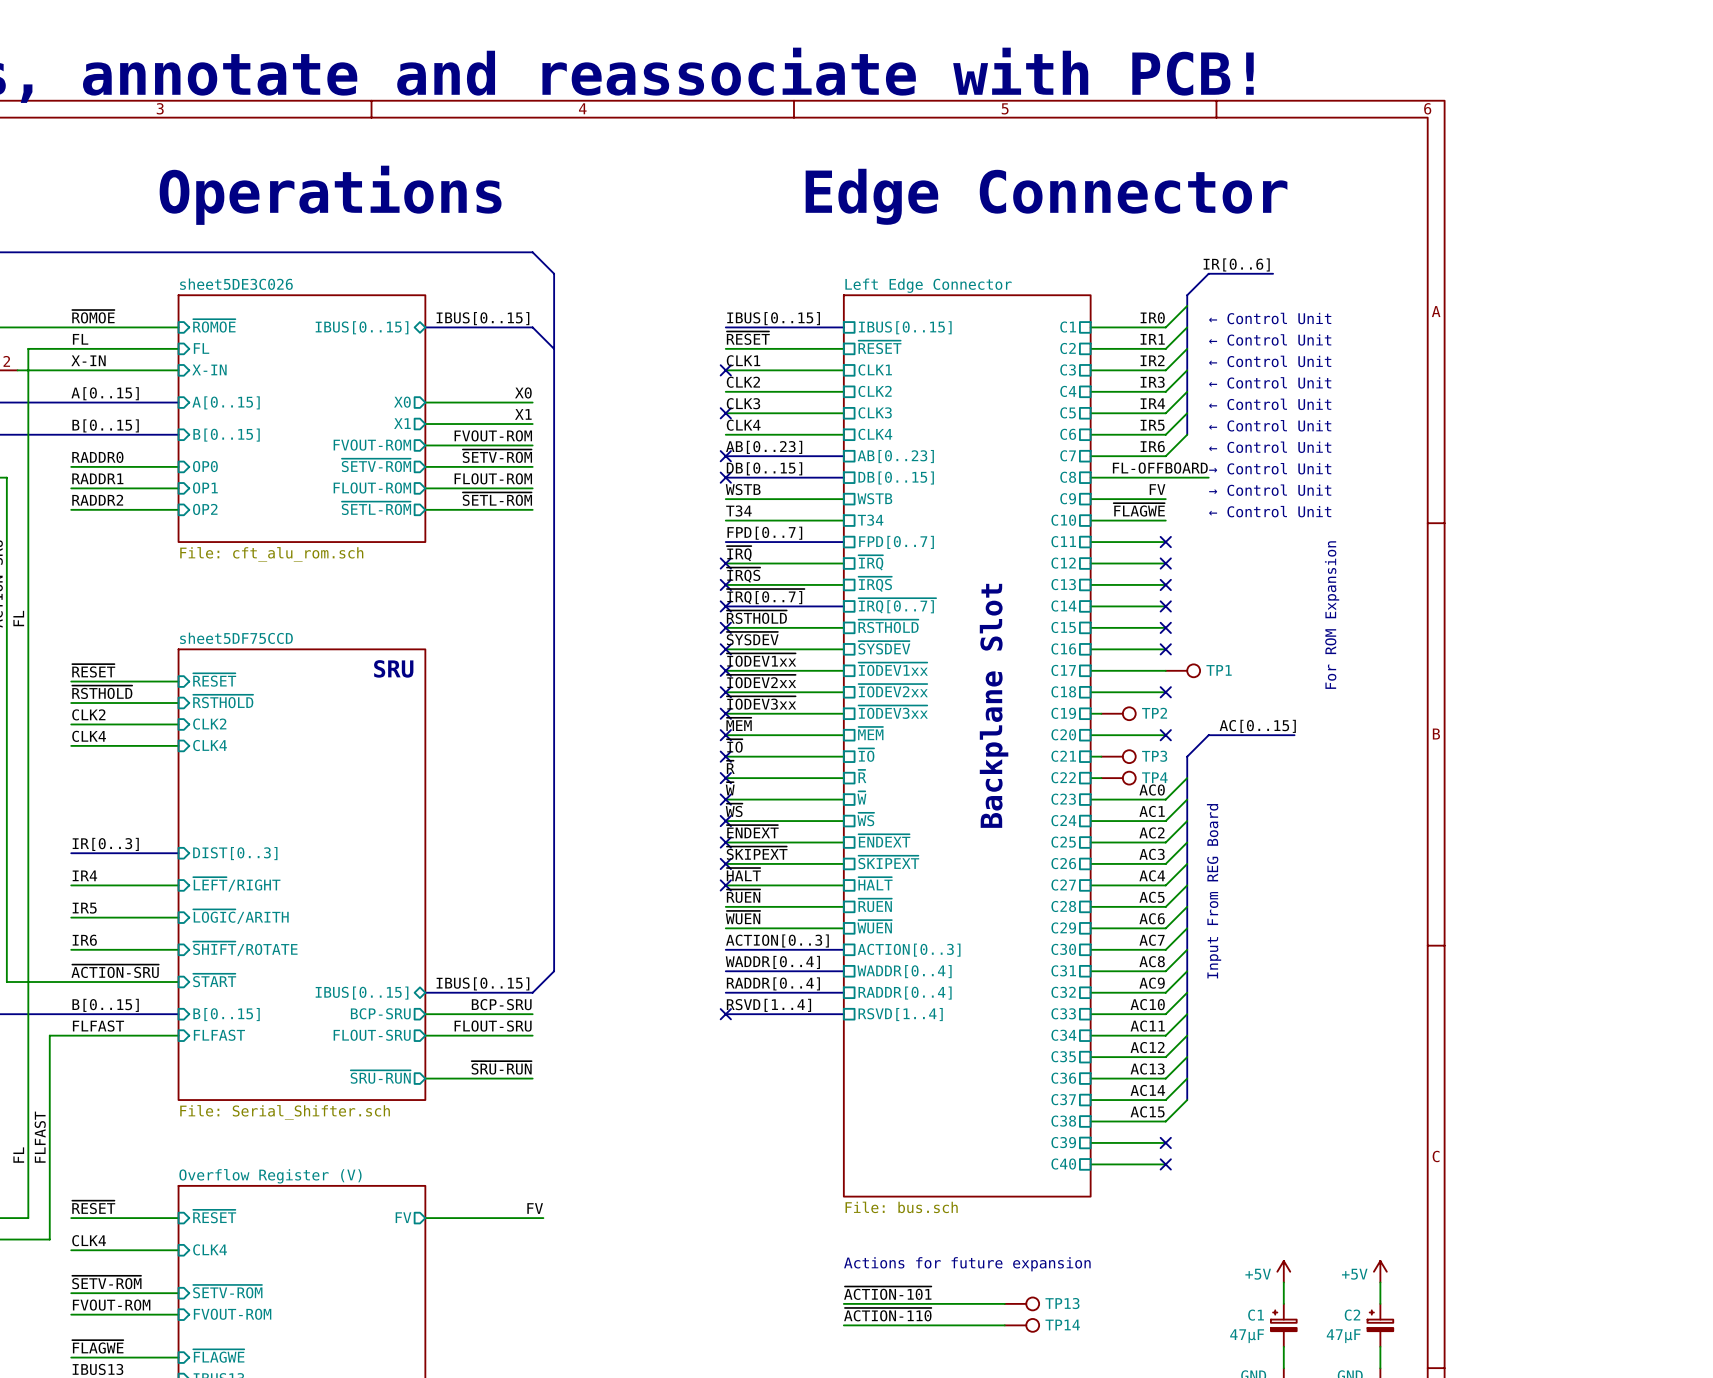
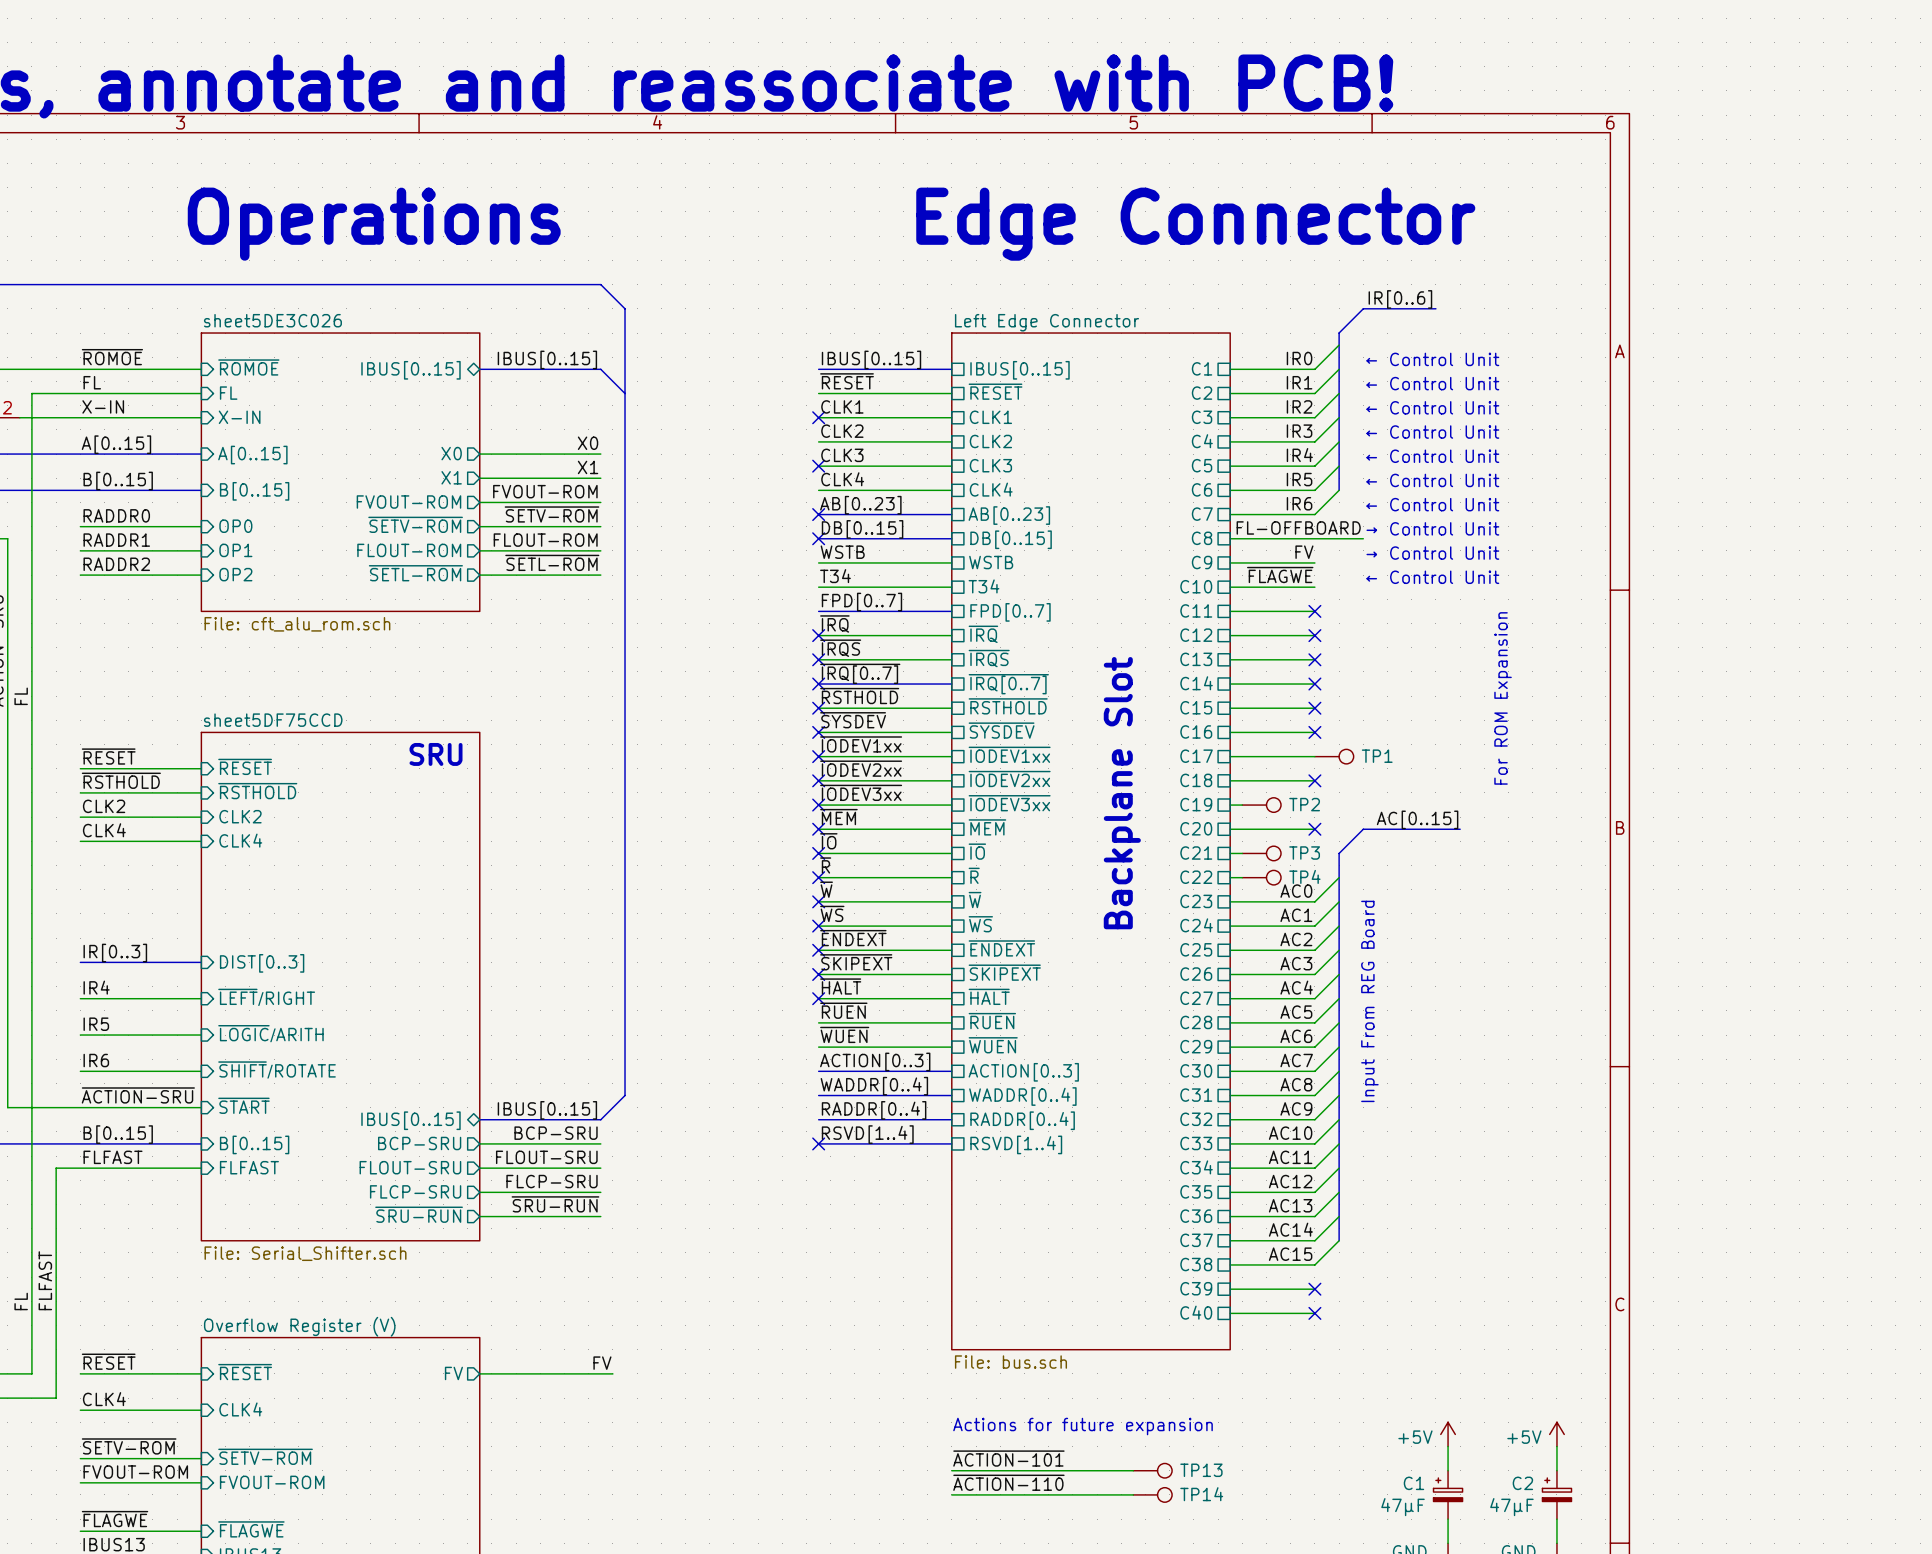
label: none -> FLCP-SRU (552, 1181)
sheet pin: none -> FLCP-SRU (415, 1191)
wire: none -> (479, 1192) (600, 1192)

